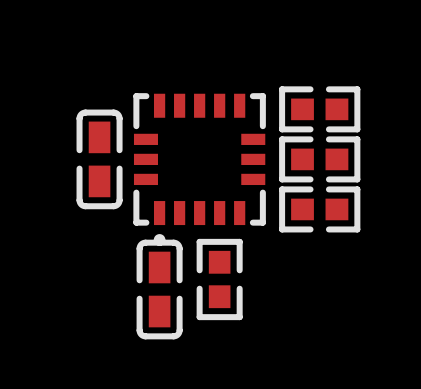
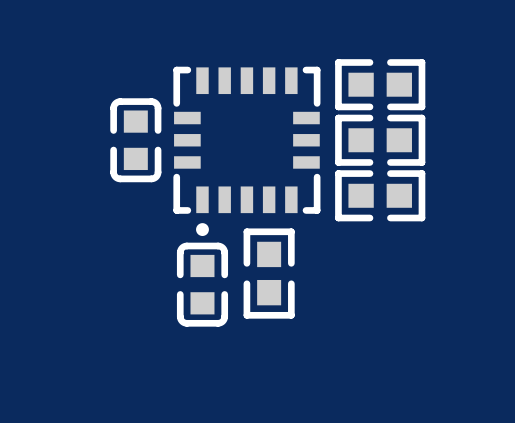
part footprint: [76, 109, 123, 210] -> [110, 98, 162, 183]
part footprint: [136, 239, 183, 340] -> [176, 242, 229, 327]

